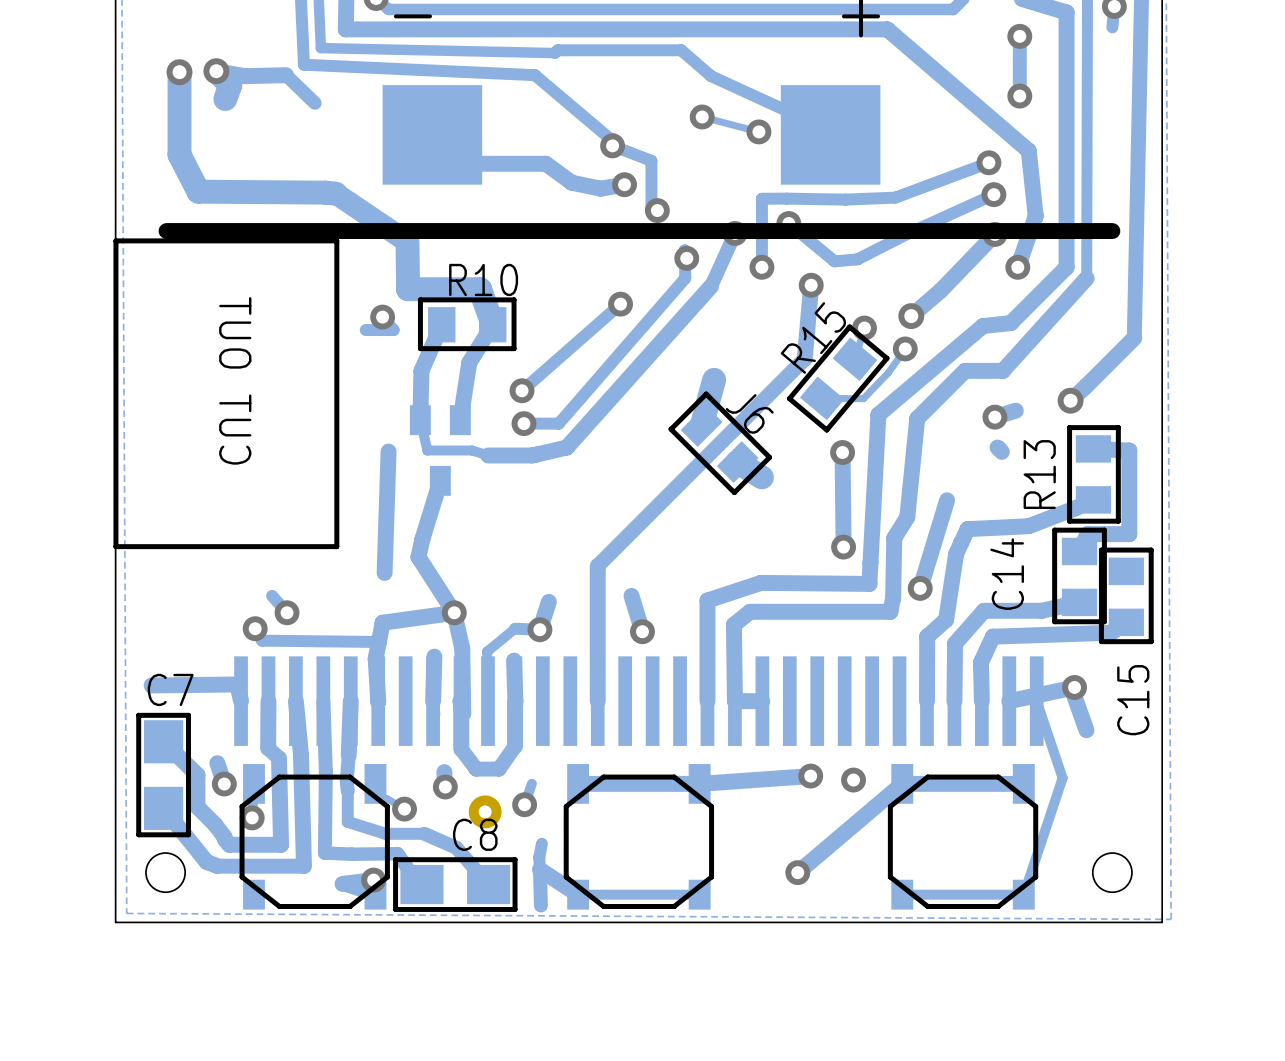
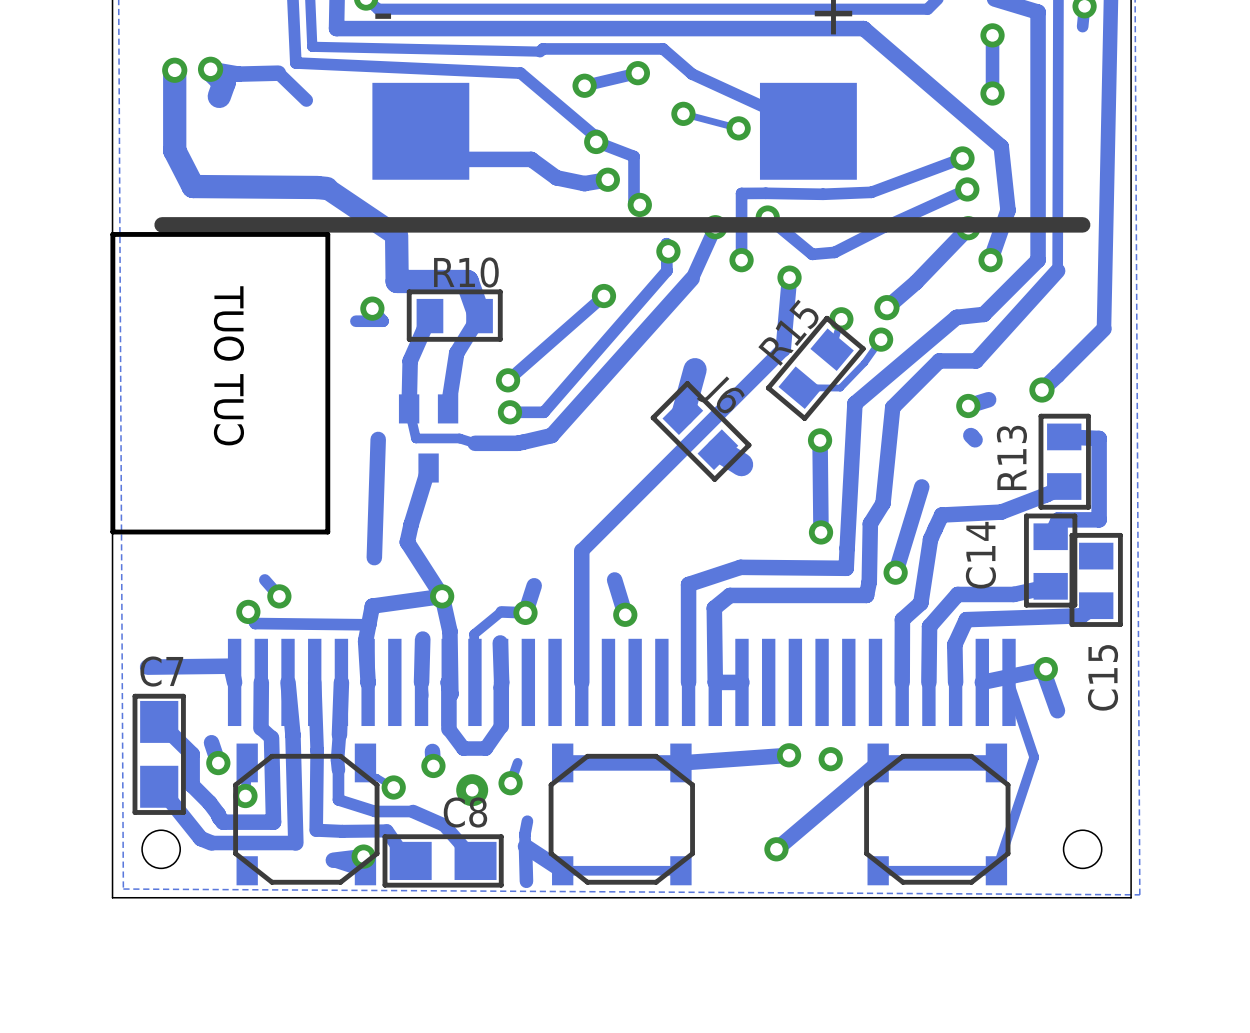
track: none -> (637, 73) (584, 85)
via: none -> (637, 73)
via: none -> (584, 85)

